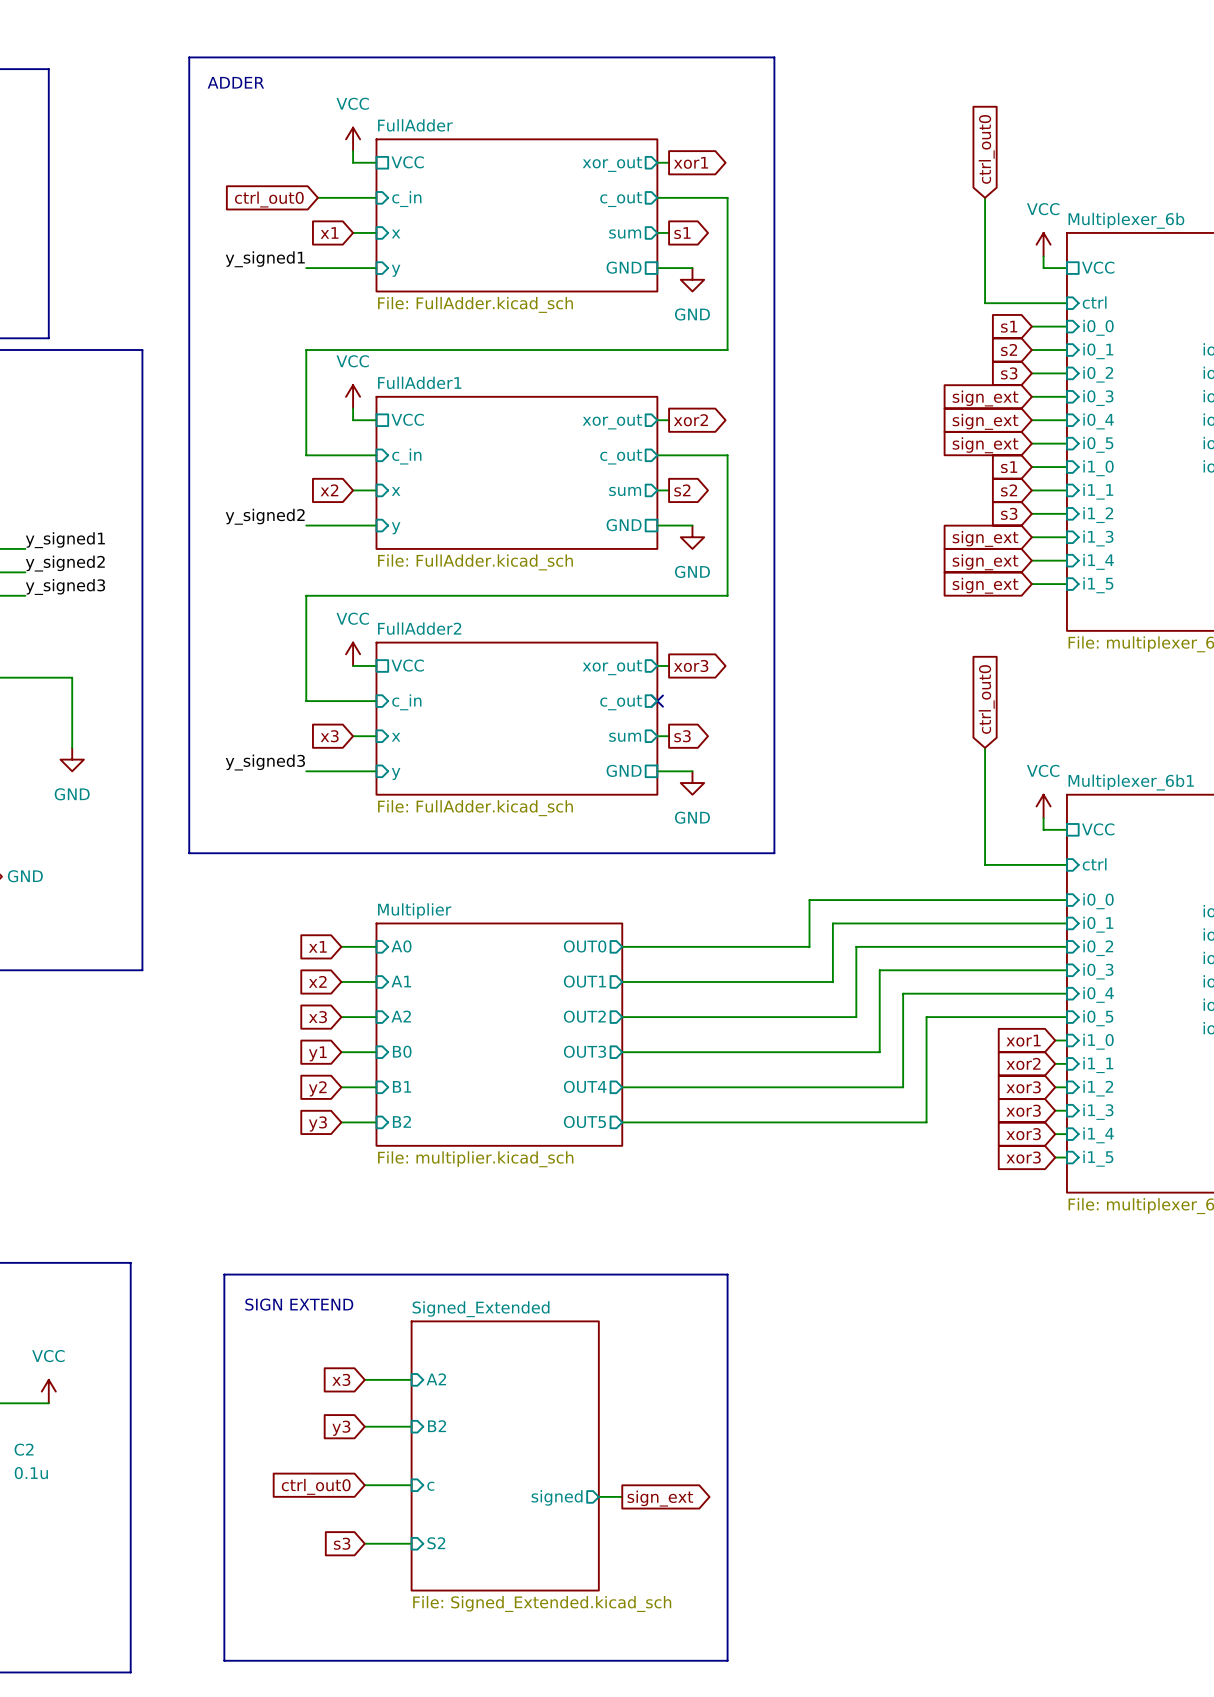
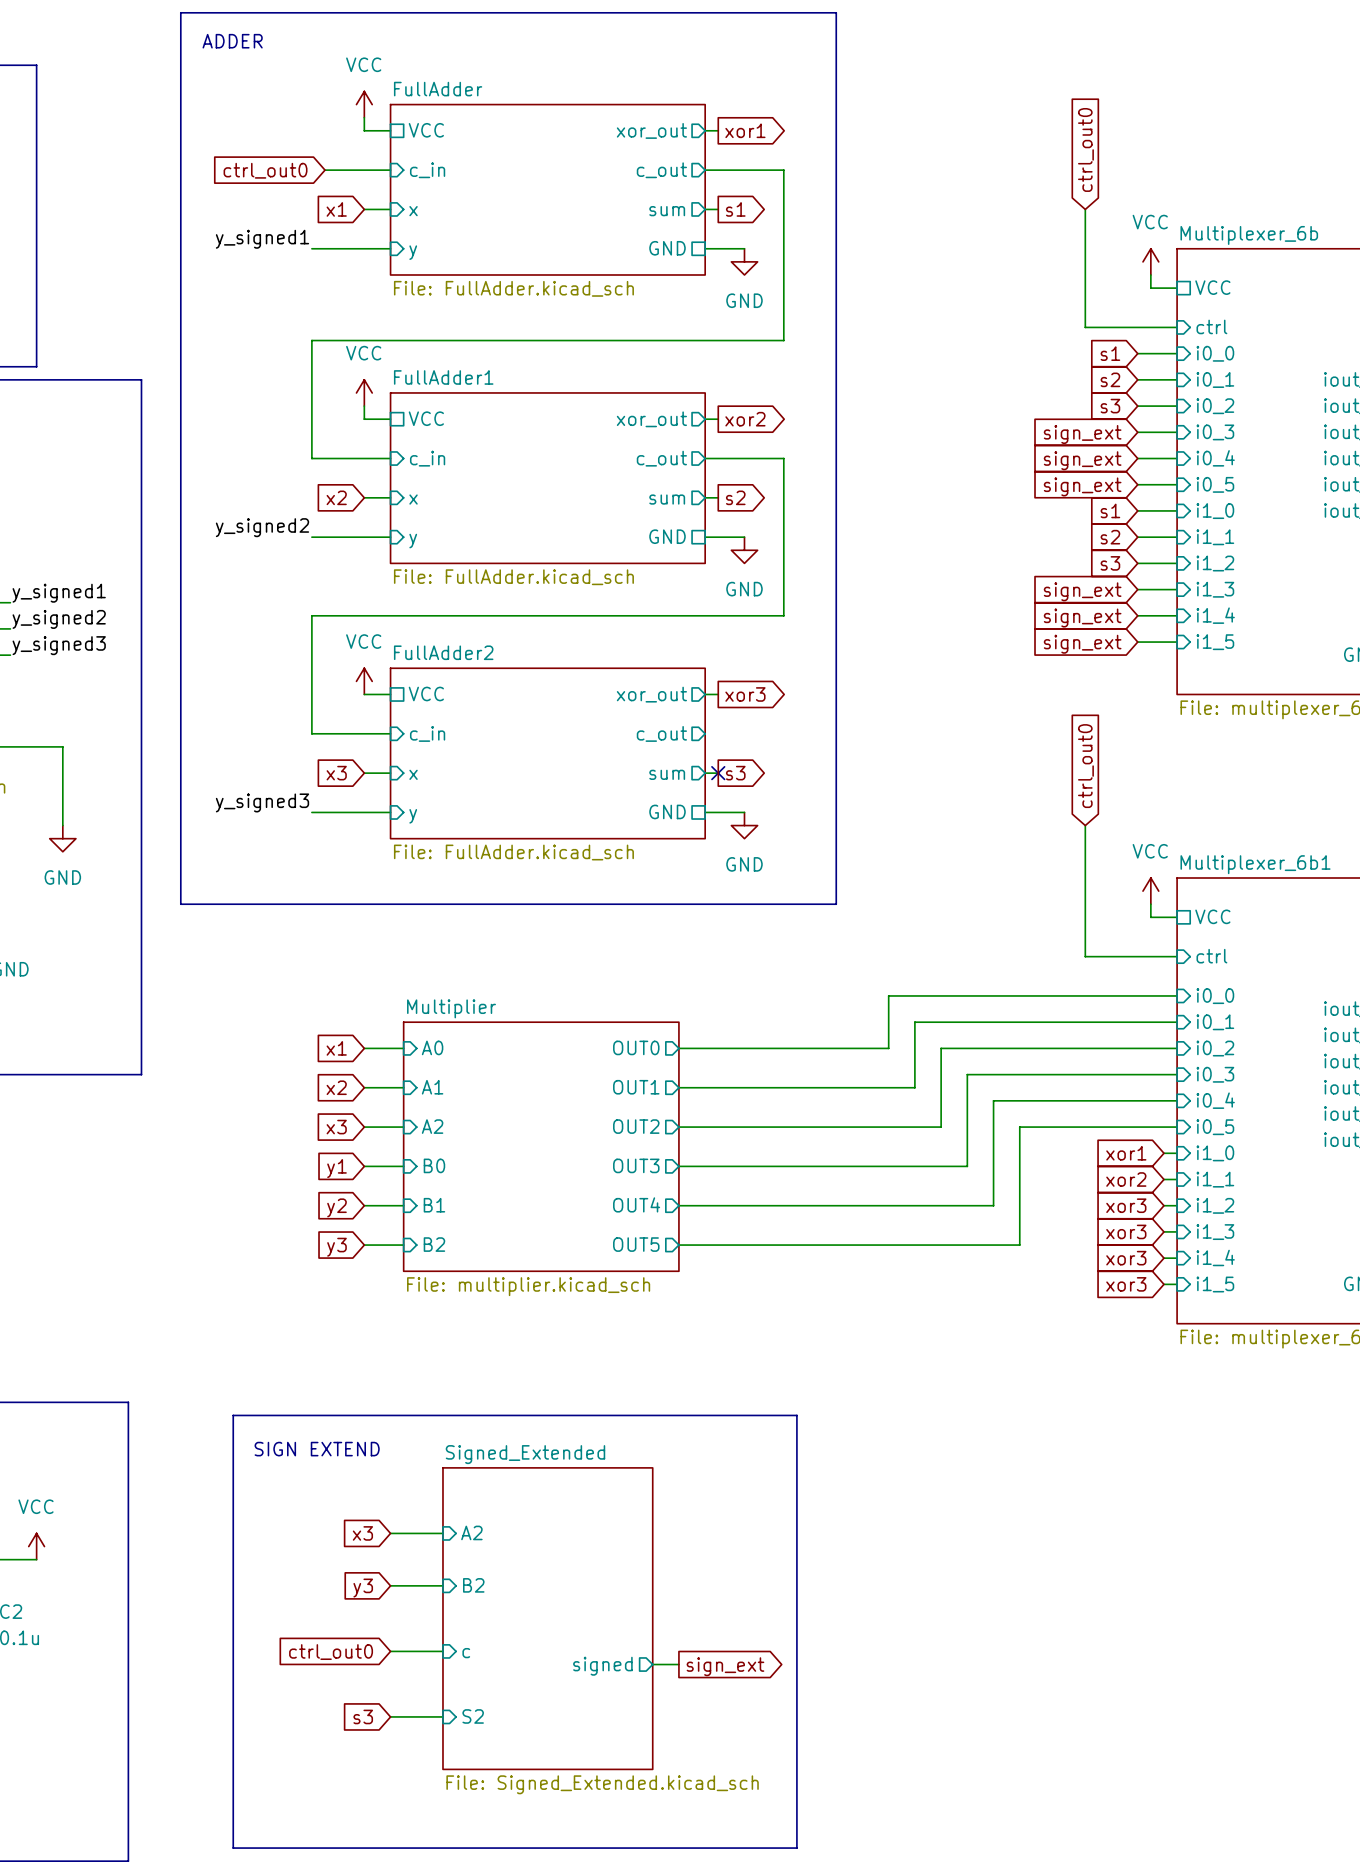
line: (189, 57) (774, 57) (774, 853) (189, 853) (189, 57) -> (180, 12) (836, 12) (836, 904) (180, 904) (180, 12)
text position: ADDER (235, 82) -> ADDER (232, 41)
wire: none -> (364, 117) (364, 130) (390, 130)
wire: none -> (705, 130) (718, 130)
power symbol position: VCC (353, 139) -> VCC (364, 104)
wire: (353, 151) (353, 162) -> (325, 170) (377, 170)
wire: (364, 162) (376, 162) -> none
sheet pin position: VCC (407, 162) -> VCC (426, 130)
wire: none -> (705, 170) (718, 170)
global label position: xor1 (691, 162) -> xor1 (745, 130)
sheet pin position: xor_out (612, 164) -> xor_out (651, 130)
wire: (317, 197) (341, 197) -> none
wire: (364, 197) (376, 197) -> none
wire: (657, 197) (727, 197) (727, 350) (306, 350) (306, 455) (341, 455) -> (718, 209) (705, 209)
global label position: ctrl_out0 (269, 199) -> ctrl_out0 (265, 170)
sheet pin position: c_in (406, 199) -> c_in (427, 170)
sheet pin position: c_out (621, 199) -> c_out (661, 170)
sheet FullAdder position: (516, 215) -> (547, 189)
wire: none -> (311, 248) (377, 248)
global label position: x1 (329, 232) -> x1 (336, 209)
wire: (364, 232) (376, 232) -> none
wire: none -> (705, 248) (718, 248)
wire: none -> (731, 248) (744, 248)
sheet pin position: x (396, 233) -> x (413, 211)
global label position: s1 (682, 233) -> s1 (735, 209)
sheet pin position: sum (625, 234) -> sum (667, 211)
label position: y_signed1 (265, 259) -> y_signed1 (262, 239)
sheet pin position: GND (624, 267) -> GND (667, 248)
wire: (306, 268) (376, 268) -> none
wire: (657, 268) (692, 268) -> none
sheet pin position: y (396, 270) -> y (413, 252)
power symbol position: GND (692, 279) -> GND (744, 261)
wire: none -> (364, 406) (364, 419) (390, 419)
wire: none -> (705, 419) (718, 419)
power symbol position: VCC (353, 396) -> VCC (364, 392)
wire: (353, 408) (353, 420) -> (731, 170) (783, 170) (783, 340) (311, 340) (311, 458) (377, 458)
sheet pin position: VCC (407, 419) -> VCC (426, 418)
wire: (364, 420) (376, 420) -> none
wire: none -> (705, 458) (718, 458)
wire: none -> (731, 458) (783, 458) (783, 615) (311, 615) (311, 733) (377, 733)
global label position: xor2 (690, 420) -> xor2 (745, 419)
sheet pin position: xor_out (612, 421) -> xor_out (651, 419)
wire: (364, 455) (376, 455) -> none
wire: (657, 455) (727, 455) (727, 595) (306, 595) (306, 701) (341, 701) -> (718, 497) (705, 497)
sheet pin position: c_in (406, 456) -> c_in (427, 458)
sheet pin position: c_out (621, 457) -> c_out (661, 458)
sheet FullAdder1 position: (516, 472) -> (547, 478)
wire: none -> (311, 537) (377, 537)
global label position: x2 (329, 490) -> x2 (336, 497)
wire: (364, 490) (376, 490) -> none
wire: none -> (705, 537) (718, 537)
wire: none -> (731, 537) (744, 537)
global label position: s2 (682, 490) -> s2 (735, 497)
sheet pin position: x (396, 491) -> x (413, 499)
sheet pin position: sum (625, 491) -> sum (667, 499)
label position: y_signed2 (265, 516) -> y_signed2 (262, 527)
wire: (306, 525) (376, 525) -> none
sheet pin position: GND (624, 525) -> GND (667, 536)
wire: (657, 525) (692, 525) -> none
sheet pin position: y (396, 528) -> y (413, 541)
power symbol position: GND (692, 537) -> GND (744, 550)
wire: none -> (364, 694) (390, 694)
power symbol position: VCC (353, 654) -> VCC (364, 681)
wire: (364, 665) (376, 665) -> none
sheet pin position: VCC (407, 665) -> VCC (426, 693)
wire: (657, 665) (669, 665) -> (705, 694) (718, 694)
global label position: xor3 (691, 666) -> xor3 (745, 694)
sheet pin position: xor_out (612, 667) -> xor_out (651, 694)
wire: (364, 701) (376, 701) -> none
wire: none -> (705, 773) (718, 773)
sheet pin position: c_in (406, 702) -> c_in (427, 733)
sheet pin position: c_out (621, 702) -> c_out (661, 733)
sheet FullAdder2 position: (516, 718) -> (547, 753)
wire: none -> (311, 812) (377, 812)
global label position: x3 (329, 736) -> x3 (336, 773)
wire: (364, 736) (376, 736) -> none
wire: none -> (705, 812) (718, 812)
wire: none -> (731, 812) (744, 812)
global label position: s3 (682, 736) -> s3 (735, 773)
sheet pin position: x (396, 737) -> x (413, 774)
sheet pin position: sum (625, 737) -> sum (667, 774)
label position: y_signed3 (265, 762) -> y_signed3 (262, 802)
sheet pin position: GND (624, 770) -> GND (667, 811)
wire: (306, 771) (376, 771) -> none
wire: (657, 771) (692, 771) -> none
sheet pin position: y (396, 774) -> y (413, 816)
power symbol position: GND (692, 783) -> GND (744, 825)

